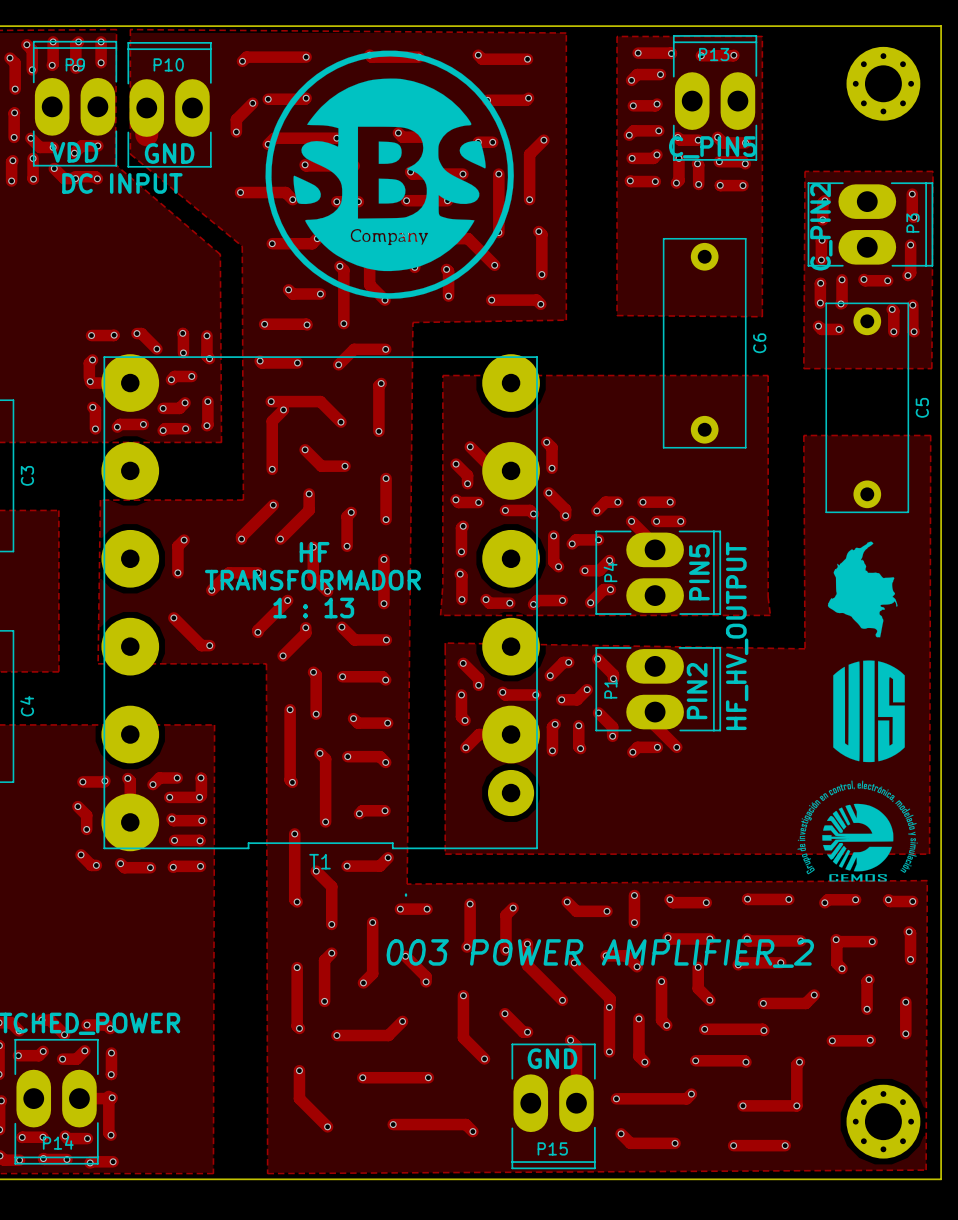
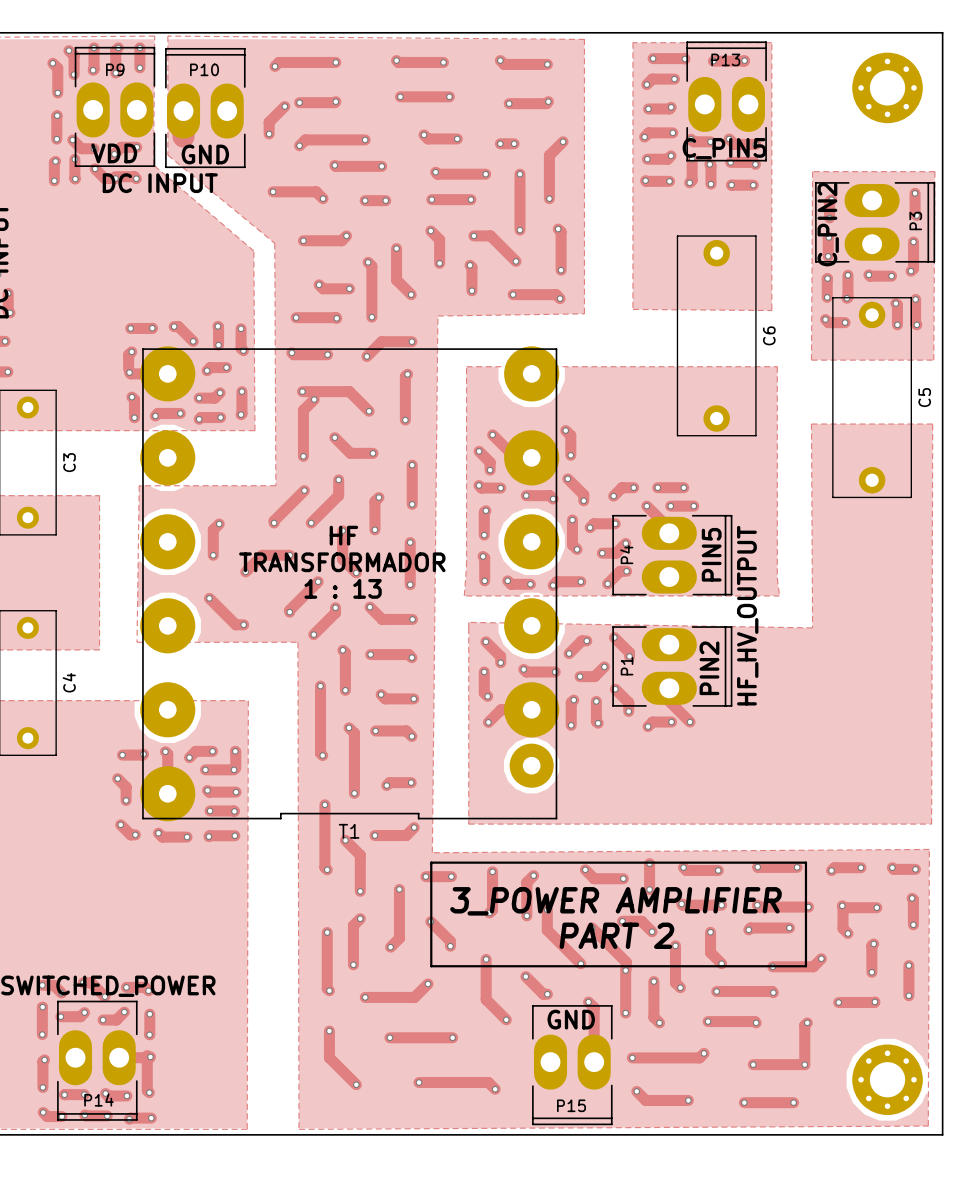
drawing: [265, 50, 514, 299] -> none
drawing: [827, 541, 898, 638] -> none
drawing: [833, 660, 905, 763] -> none
drawing: [797, 780, 918, 882] -> none
line: none -> (431, 862) (805, 862) (805, 966) (431, 966) (431, 863)
text: 003 POWER AMPLIFIER_2 (600, 953) -> 3_POWER AMPLIFIER (616, 901)
text: none -> PART 2 (616, 935)

